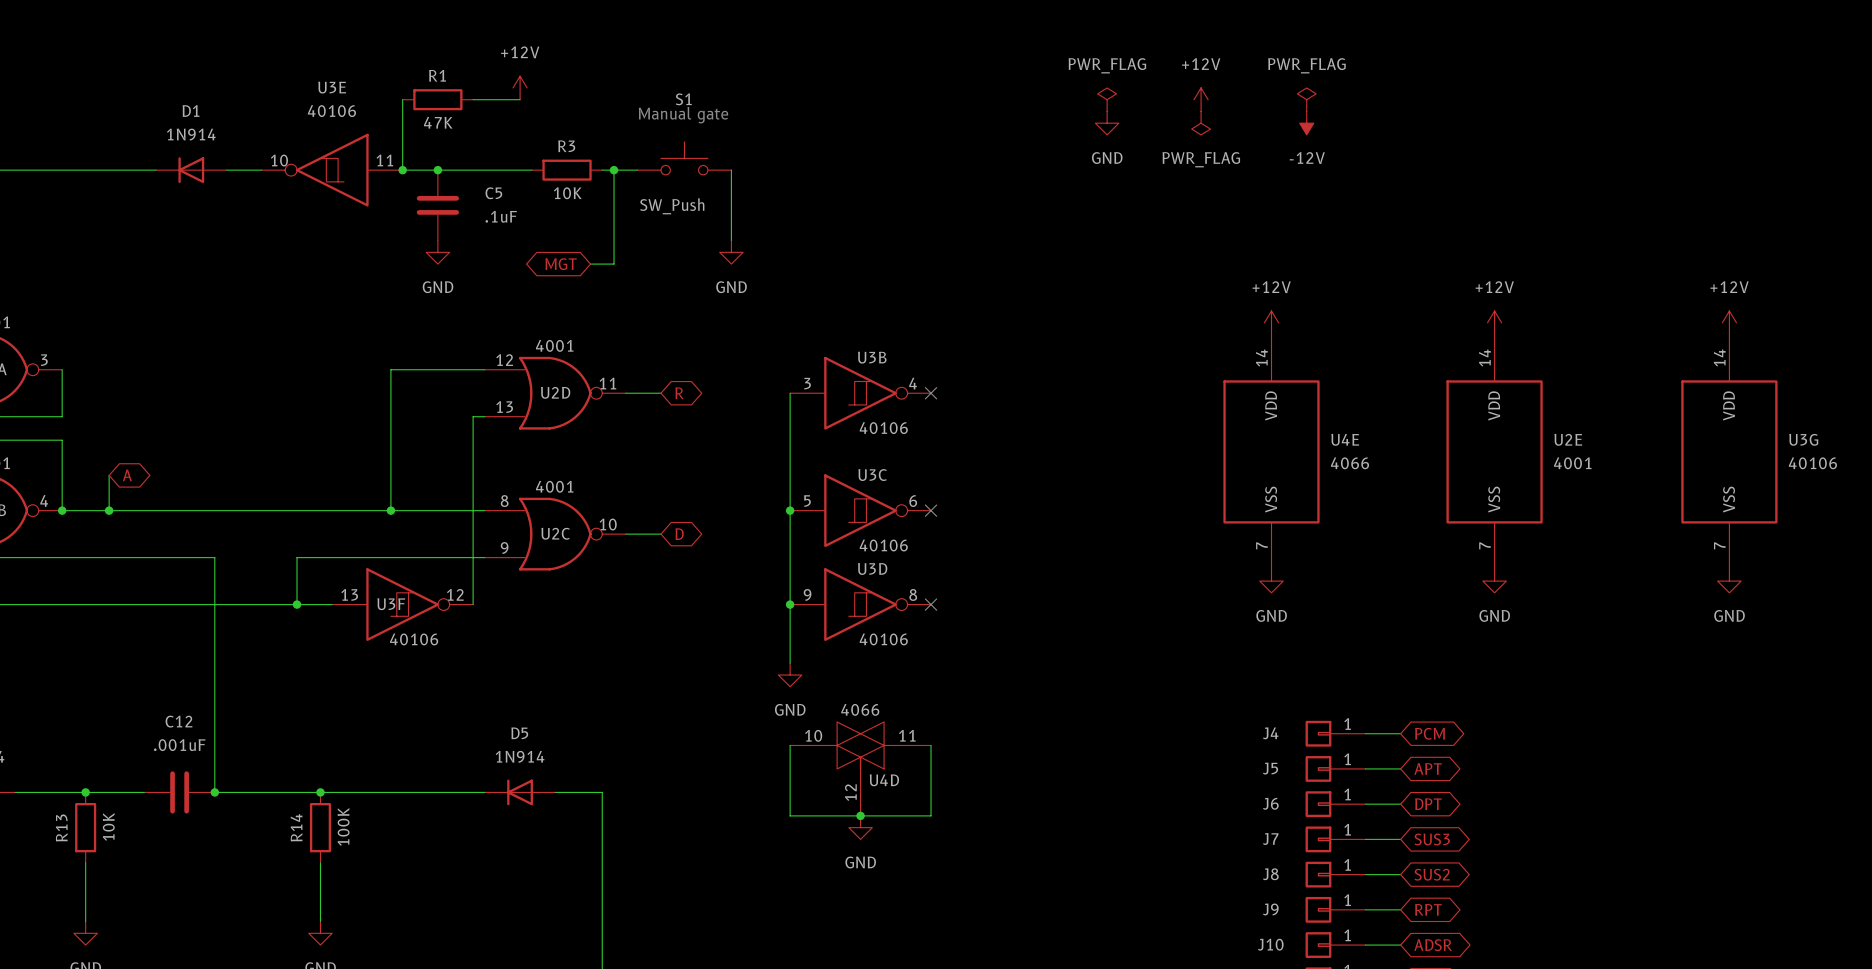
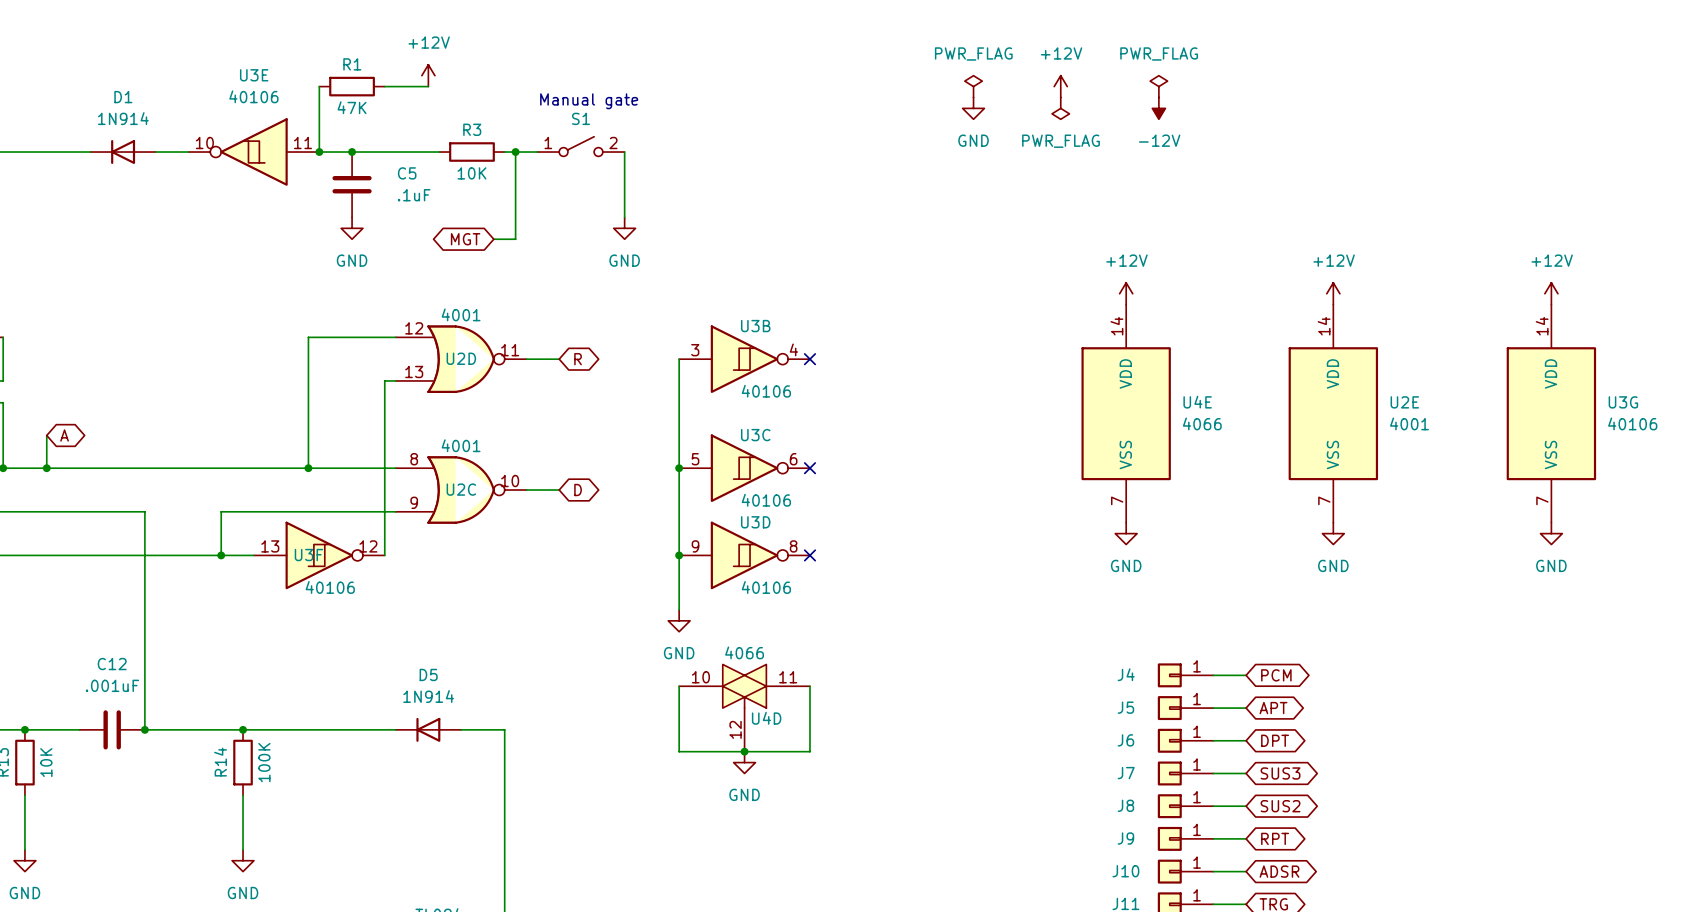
S1 name position: S1 (683, 99) -> S1 (581, 118)
S1 symbol: [637, 141, 732, 175] -> [537, 136, 625, 157]
S1 value: SW_Push (672, 206) -> none

